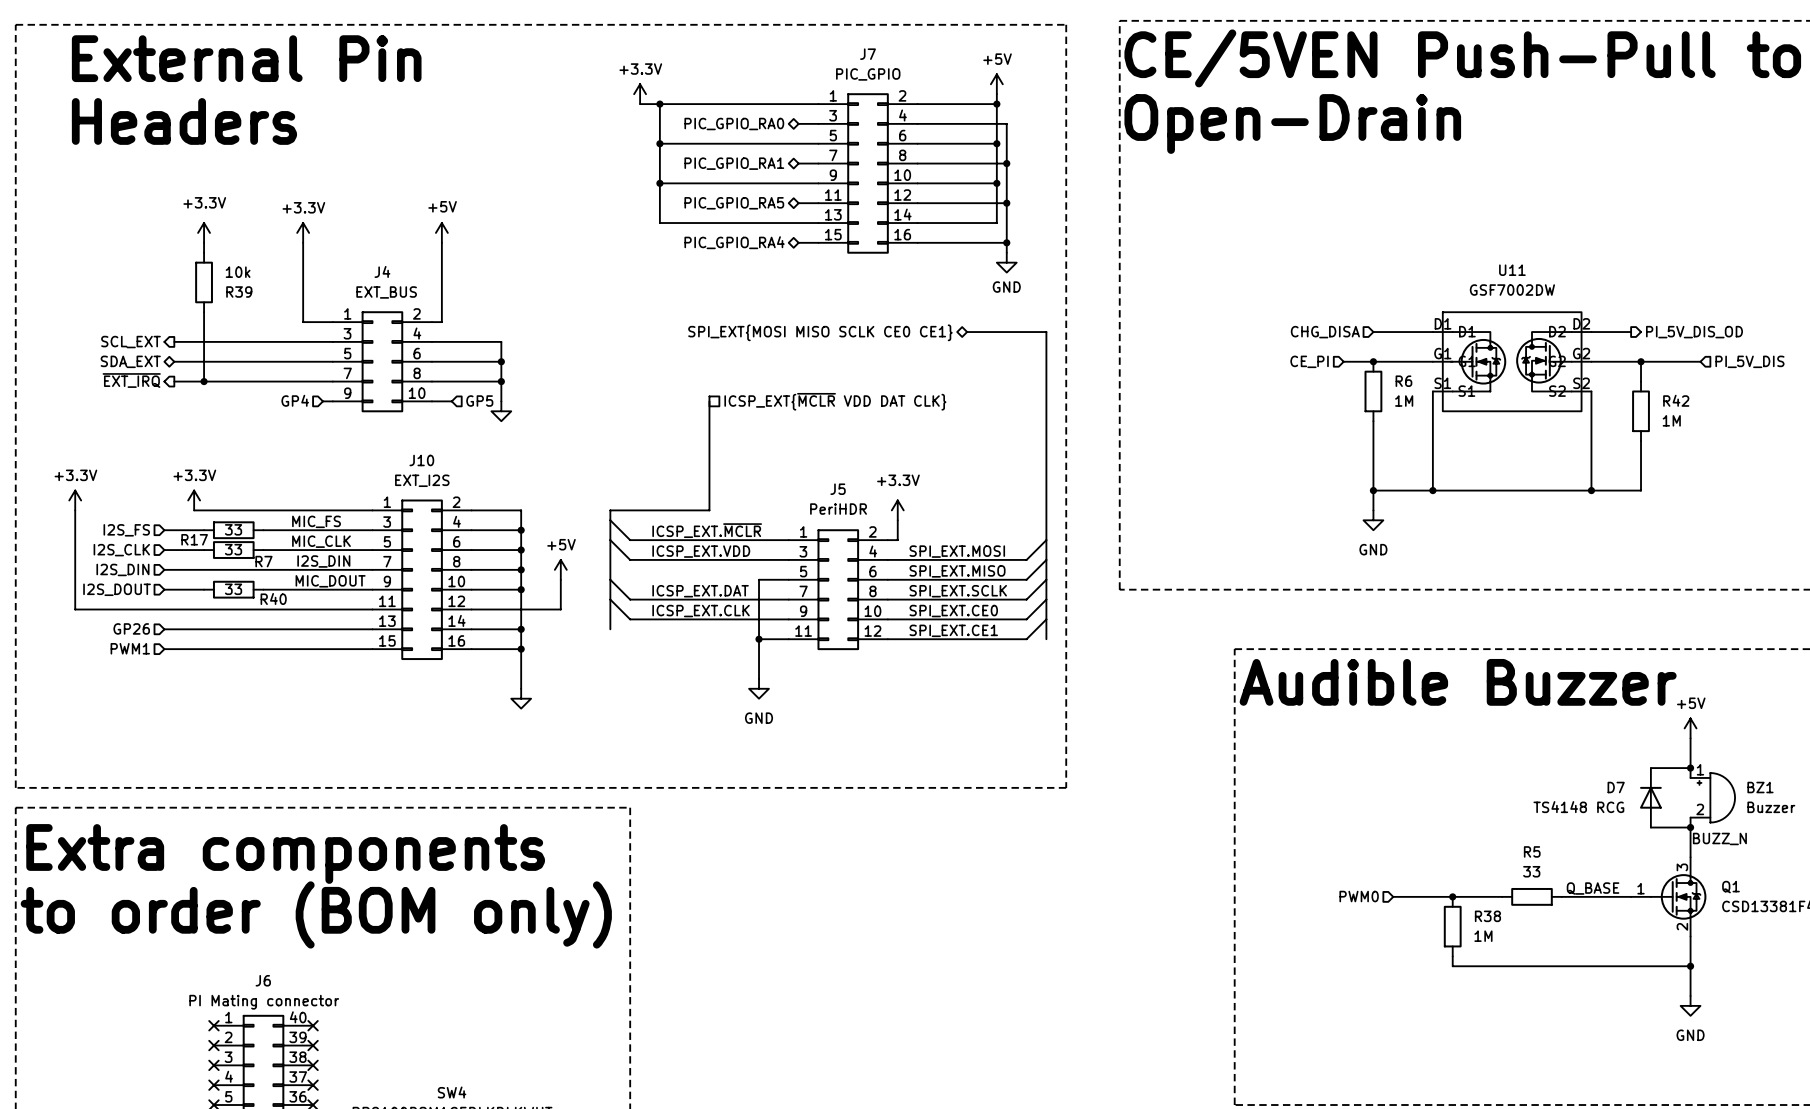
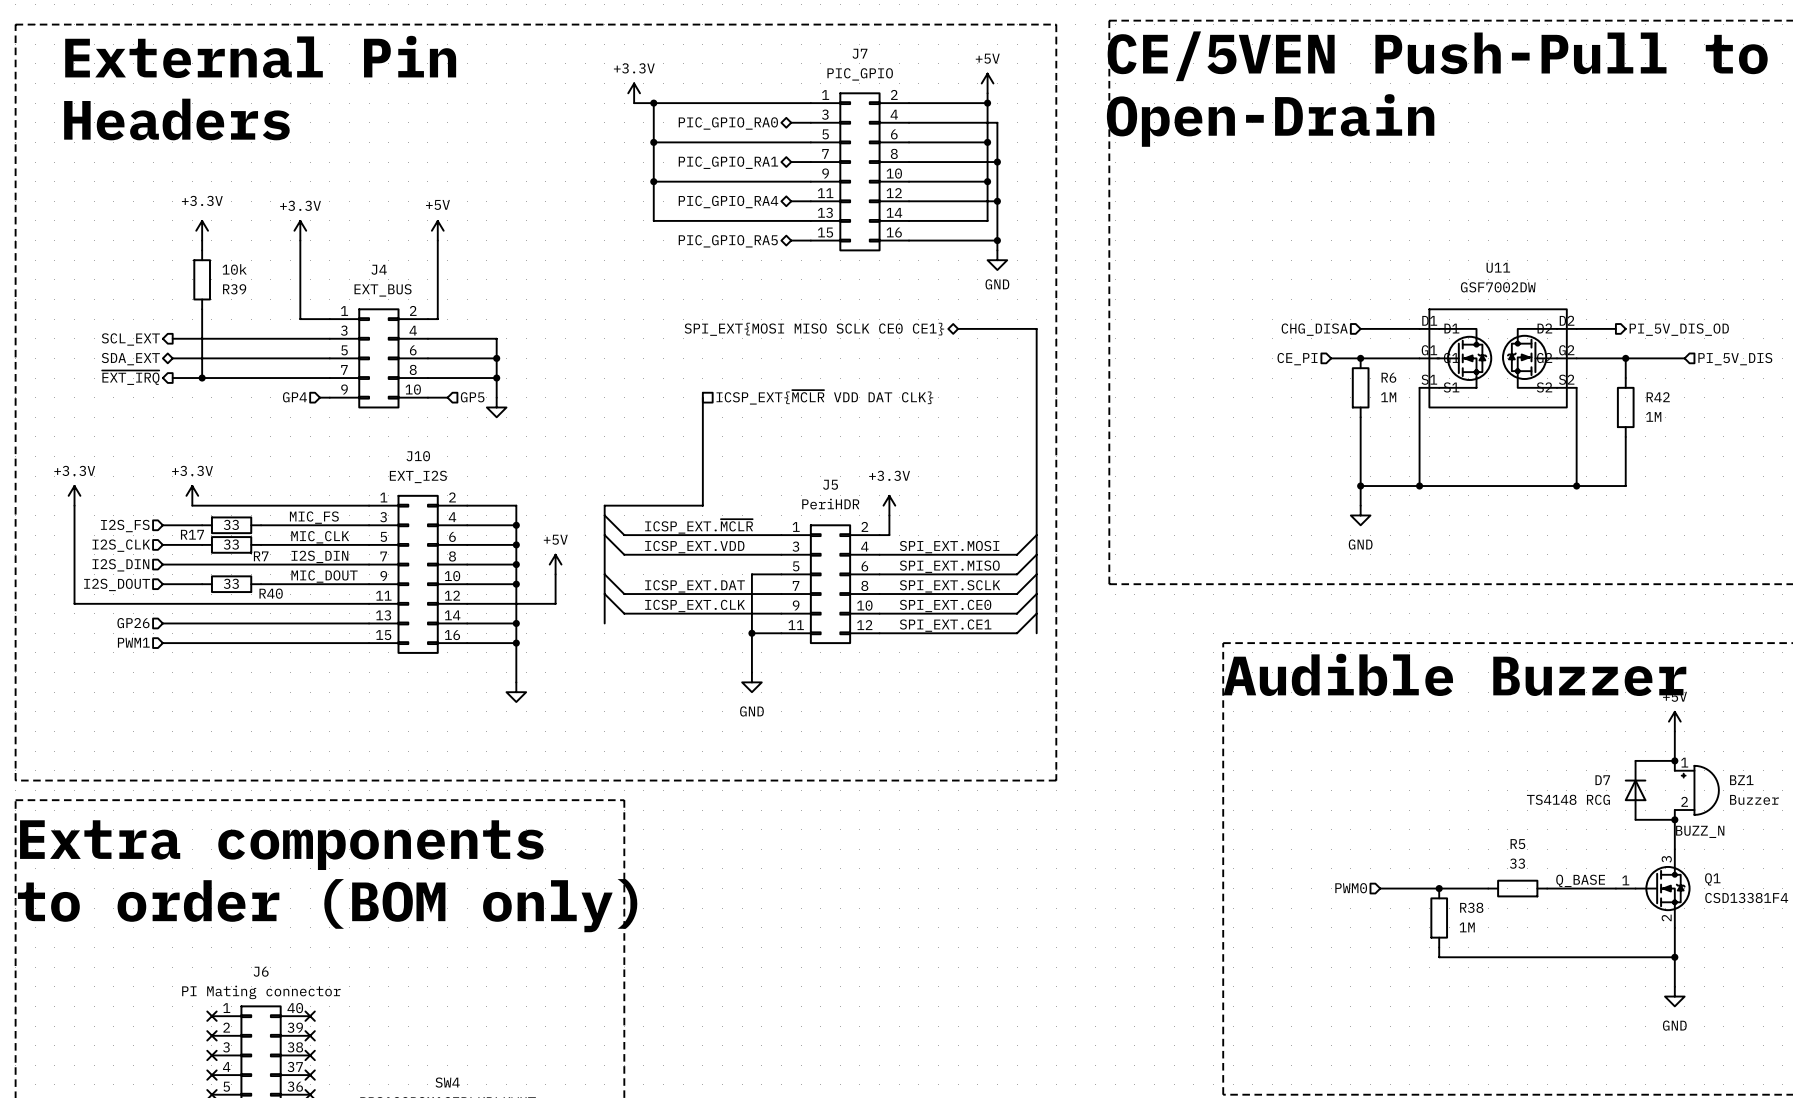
hierarchical label: PIC_GPIO_RA5 (734, 203) -> PIC_GPIO_RA4 (728, 202)
hierarchical label: PIC_GPIO_RA4 (734, 242) -> PIC_GPIO_RA5 (728, 241)

